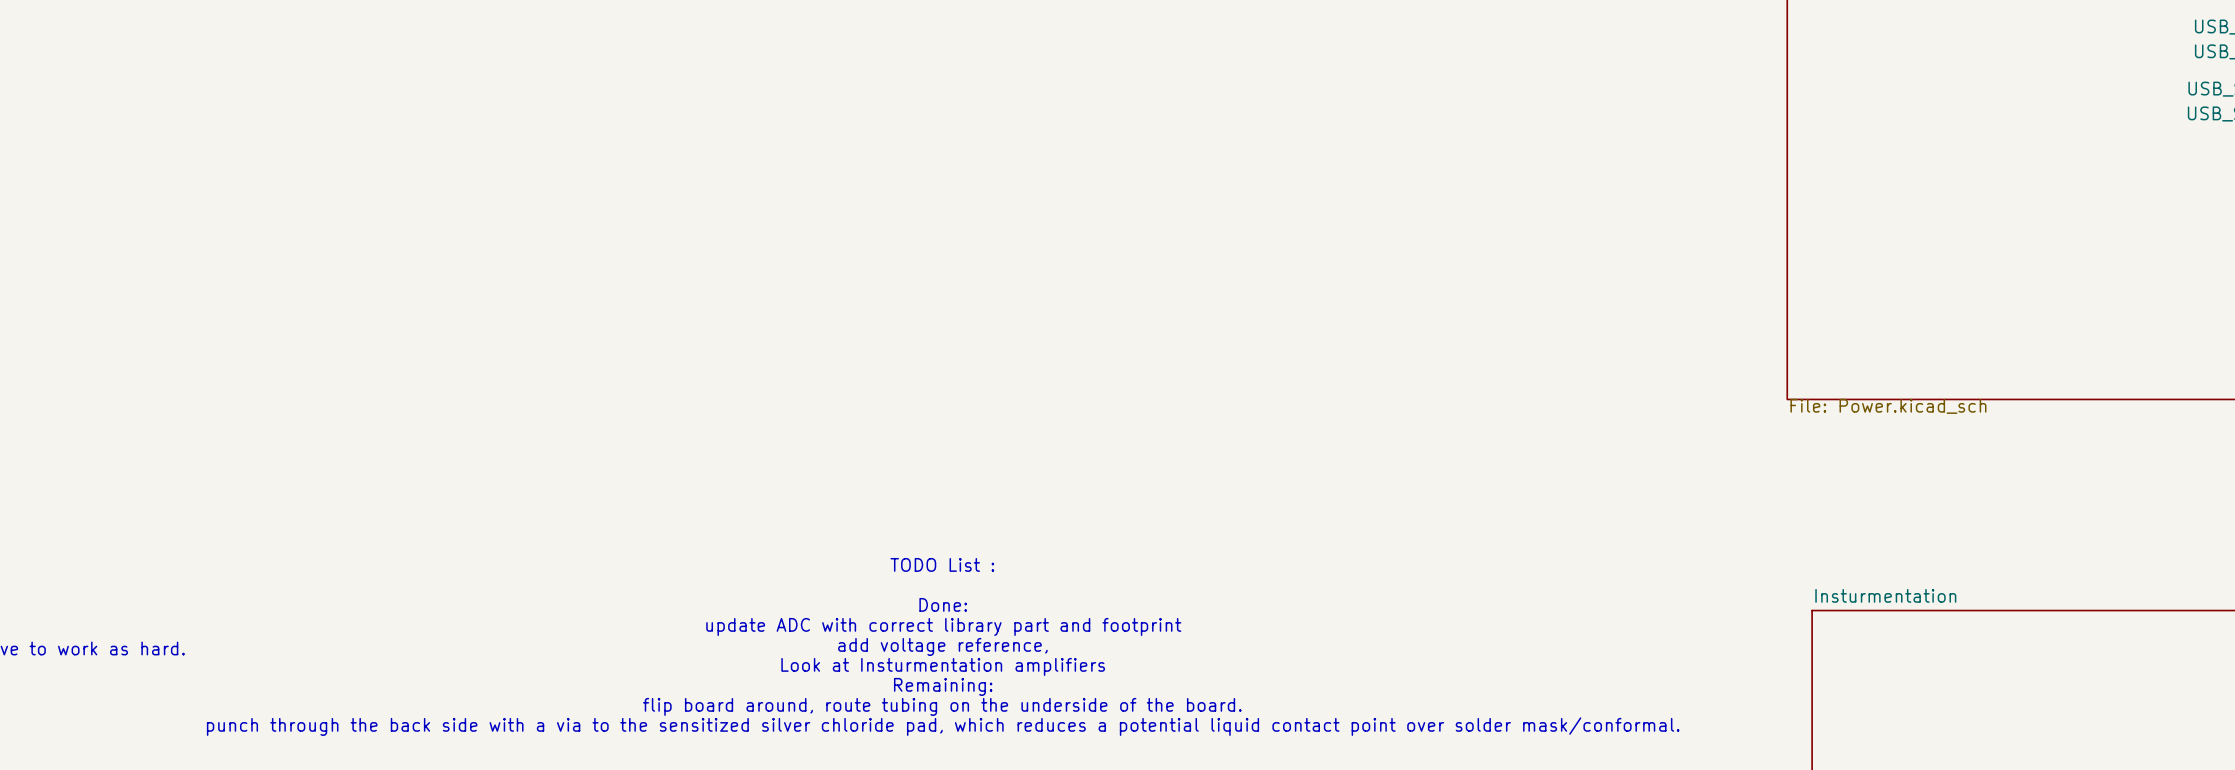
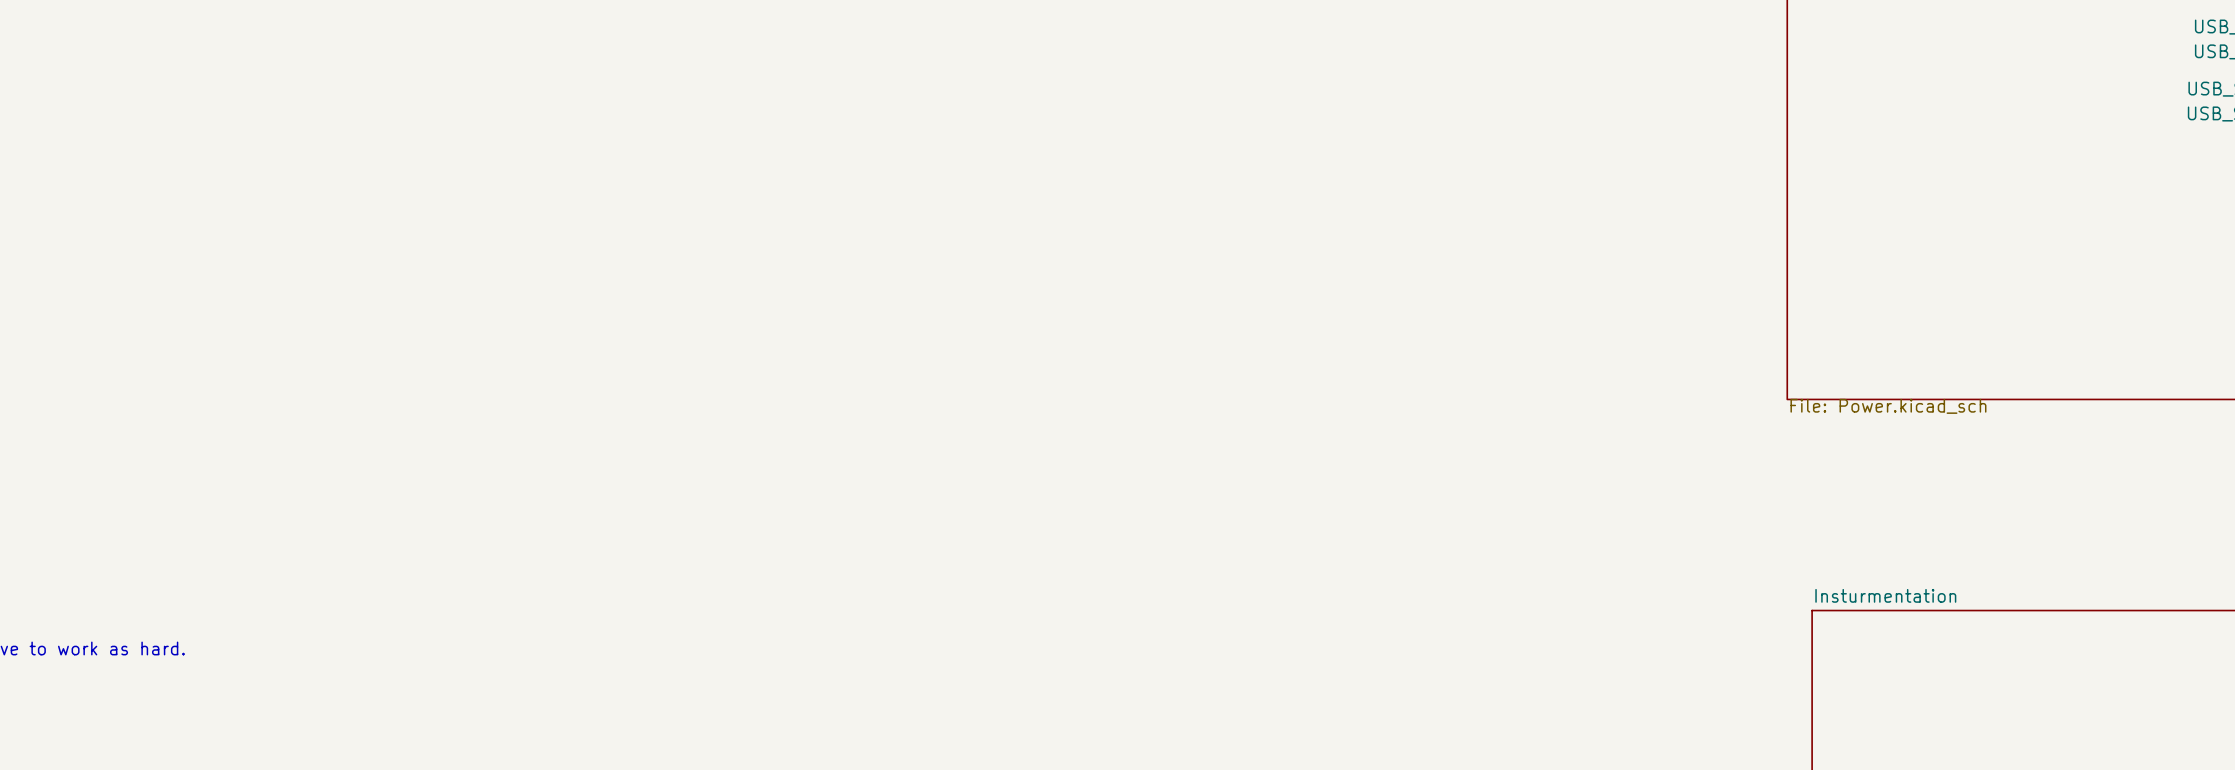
text: TODO List : (942, 564) -> none
text: Done: (943, 604) -> none
text: update ADC with correct library part and footprint (943, 626) -> none
text: add voltage reference, (942, 646) -> none
text: Look at Insturmentation amplifiers (943, 666) -> none
text: Remaining: (943, 686) -> none
text: flip board around, route tubing on the underside of the board. (942, 706) -> none
text: punch through the back side with a via to the sensitized silver chloride pad, which reduces a potential liquid contact point over solder mask/conformal. (943, 726) -> none

